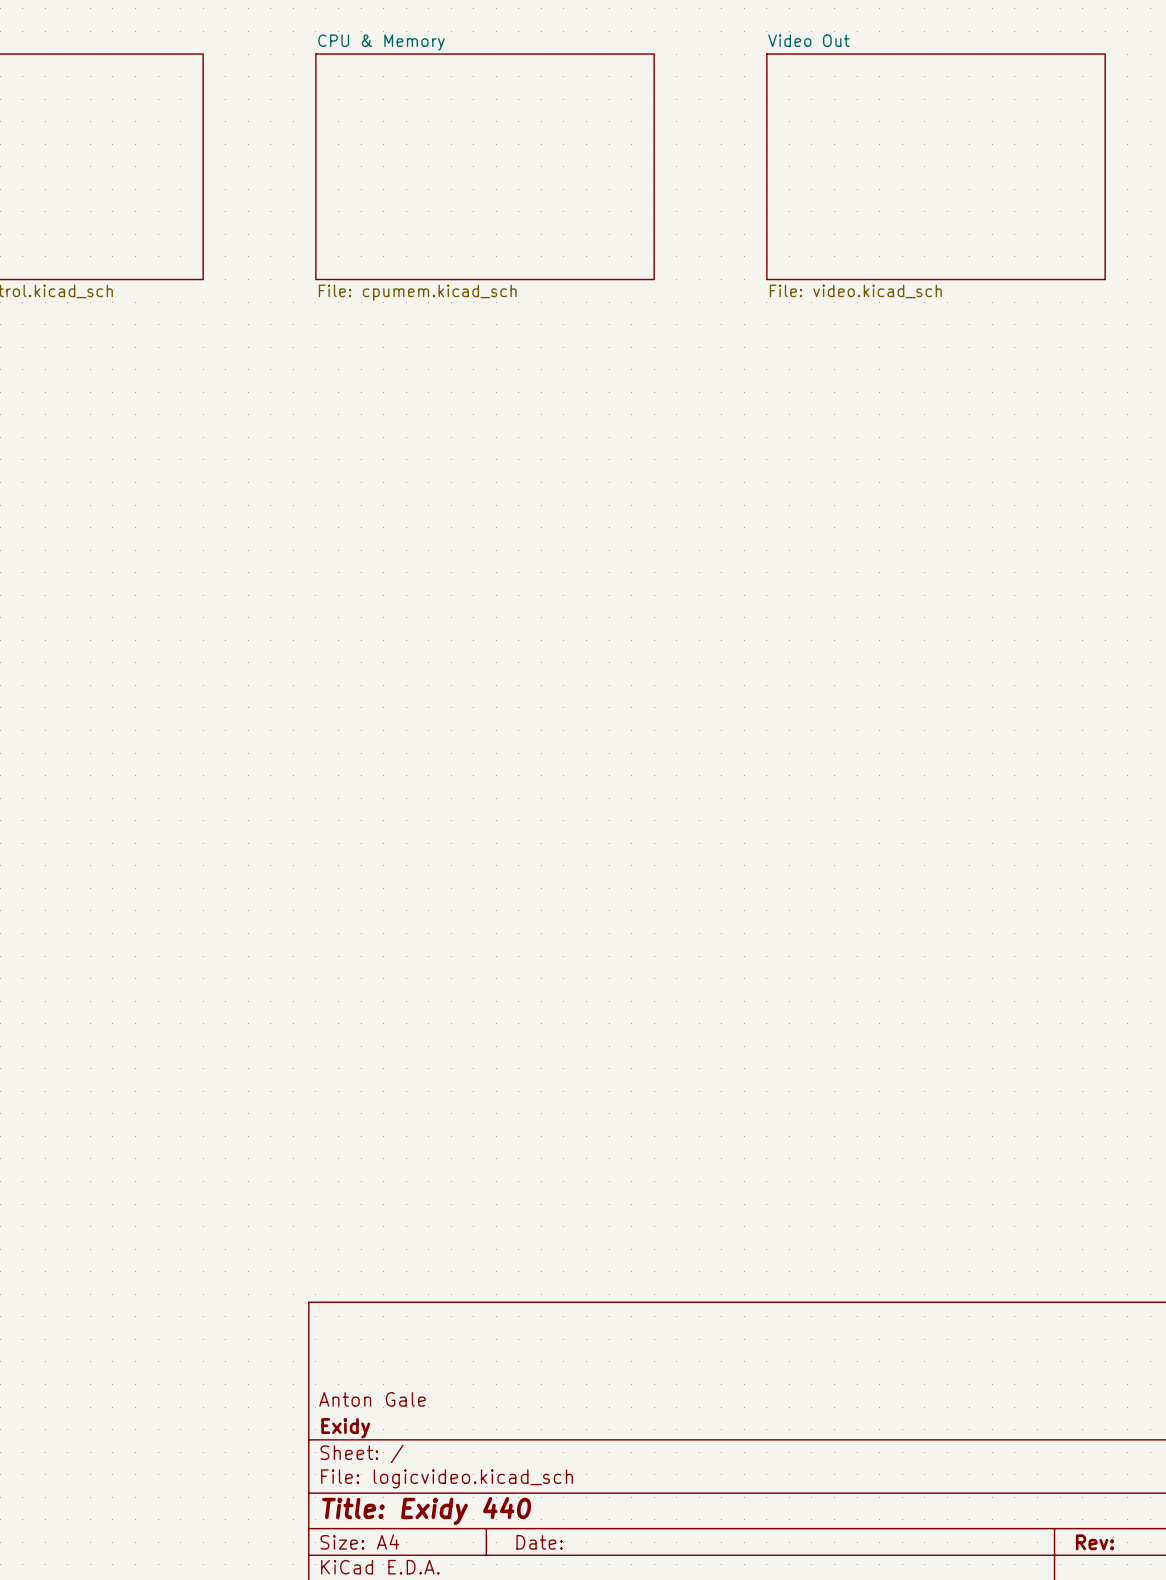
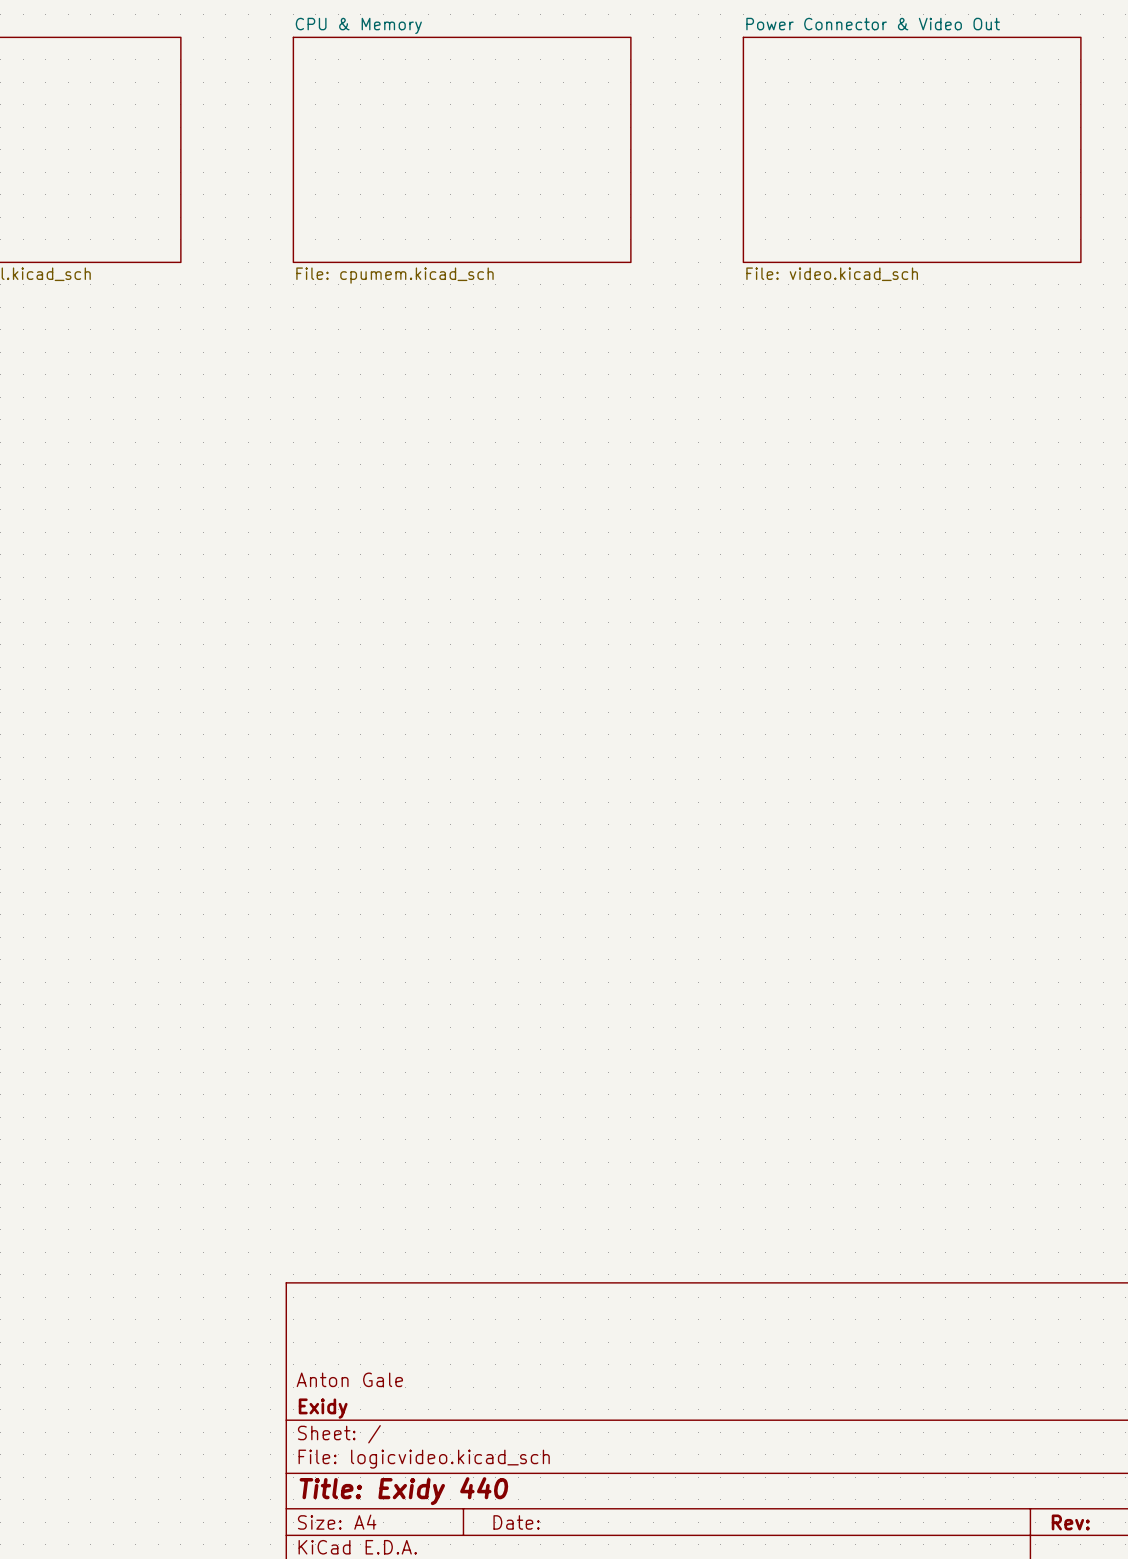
sheet Video Out name: Video Out (808, 40) -> Power Connector & Video Out (873, 24)

